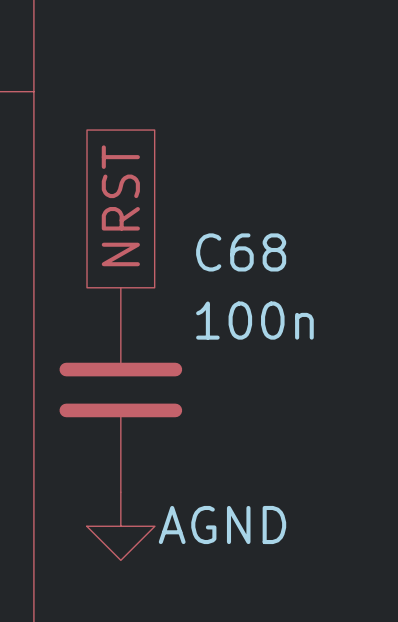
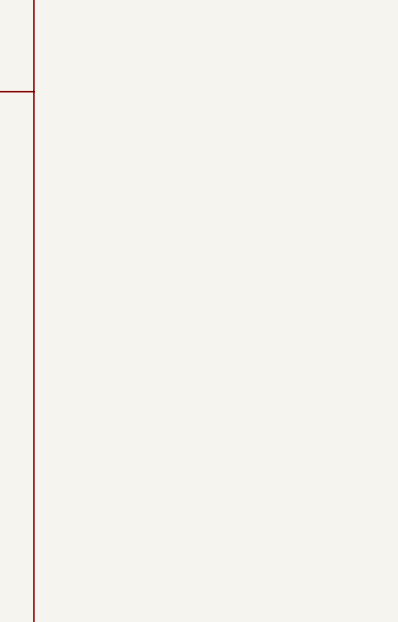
global label: NRST (120, 205) -> none
C68: 100n (120, 389) -> none
power symbol: AGND (120, 526) -> none

